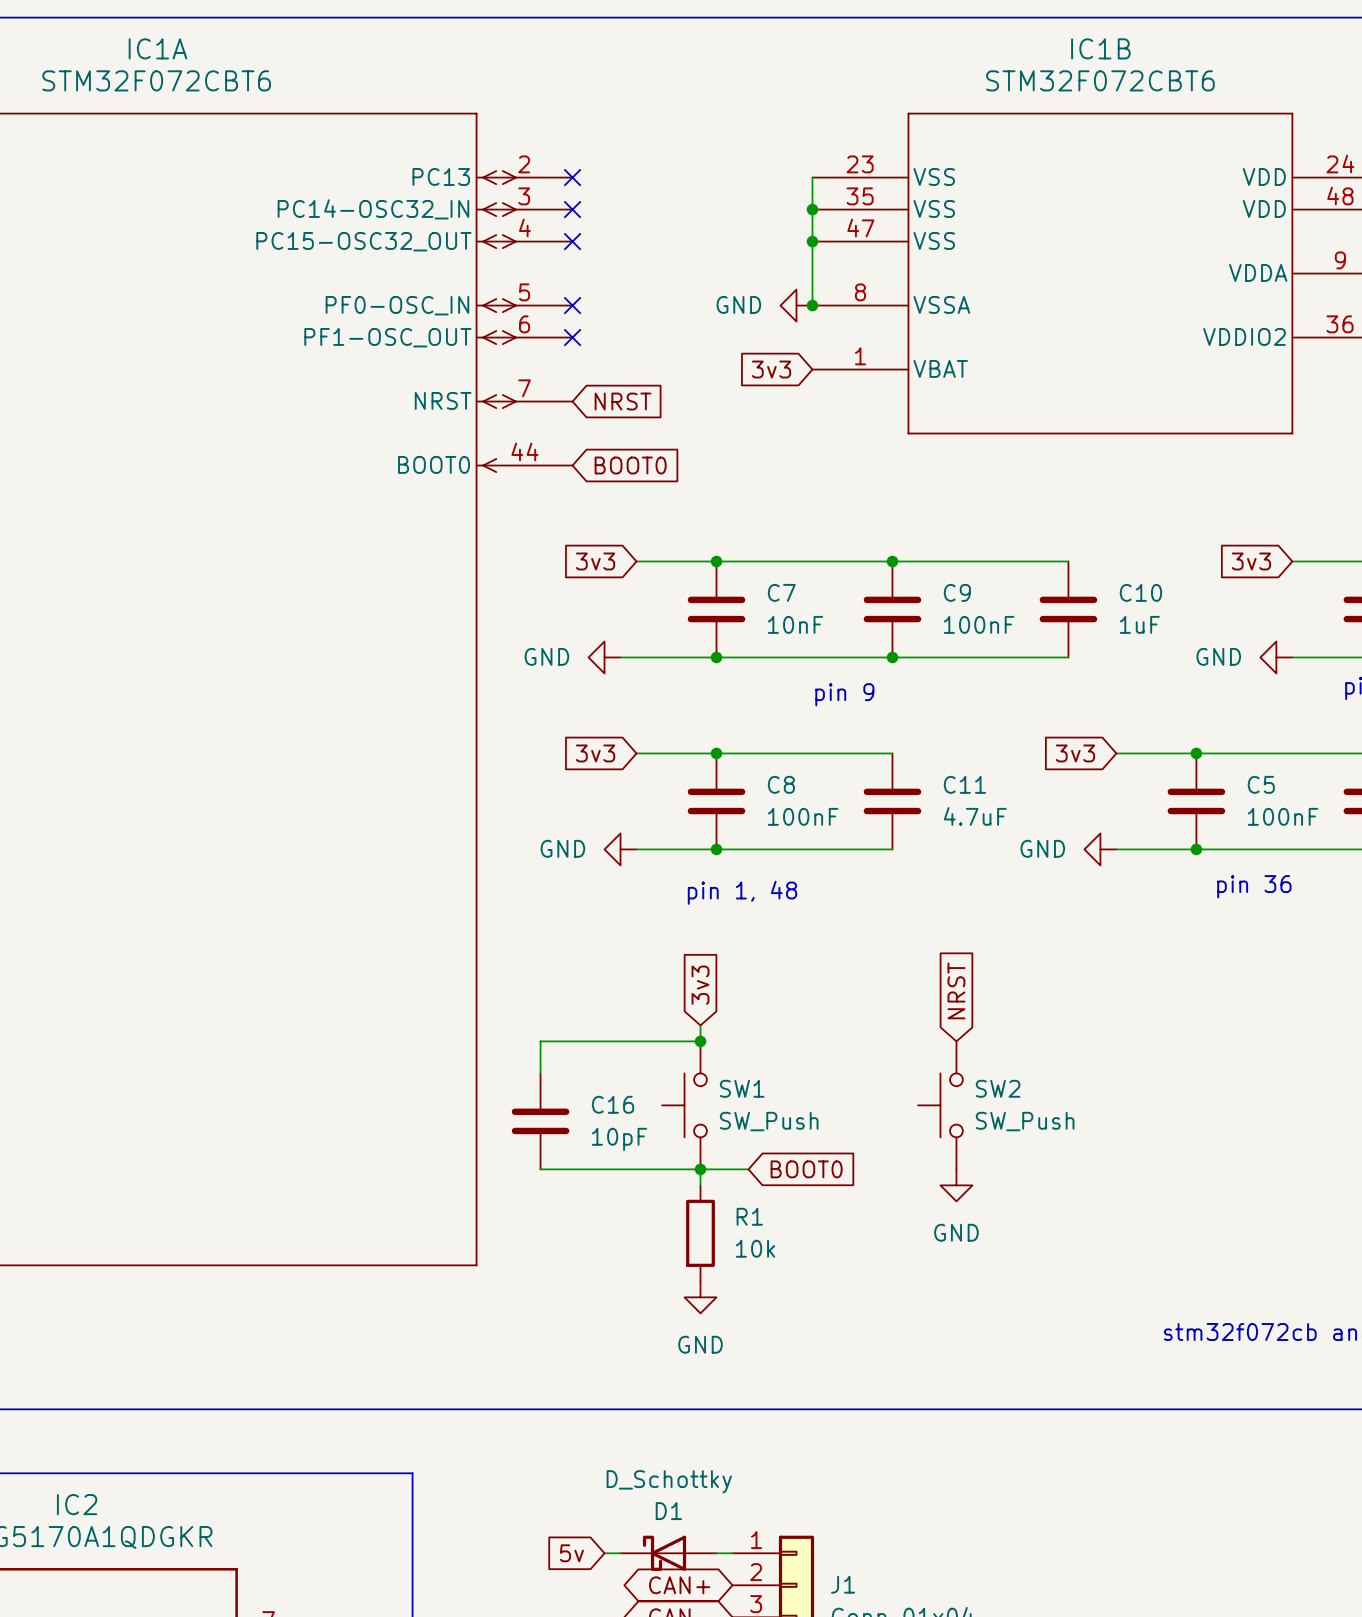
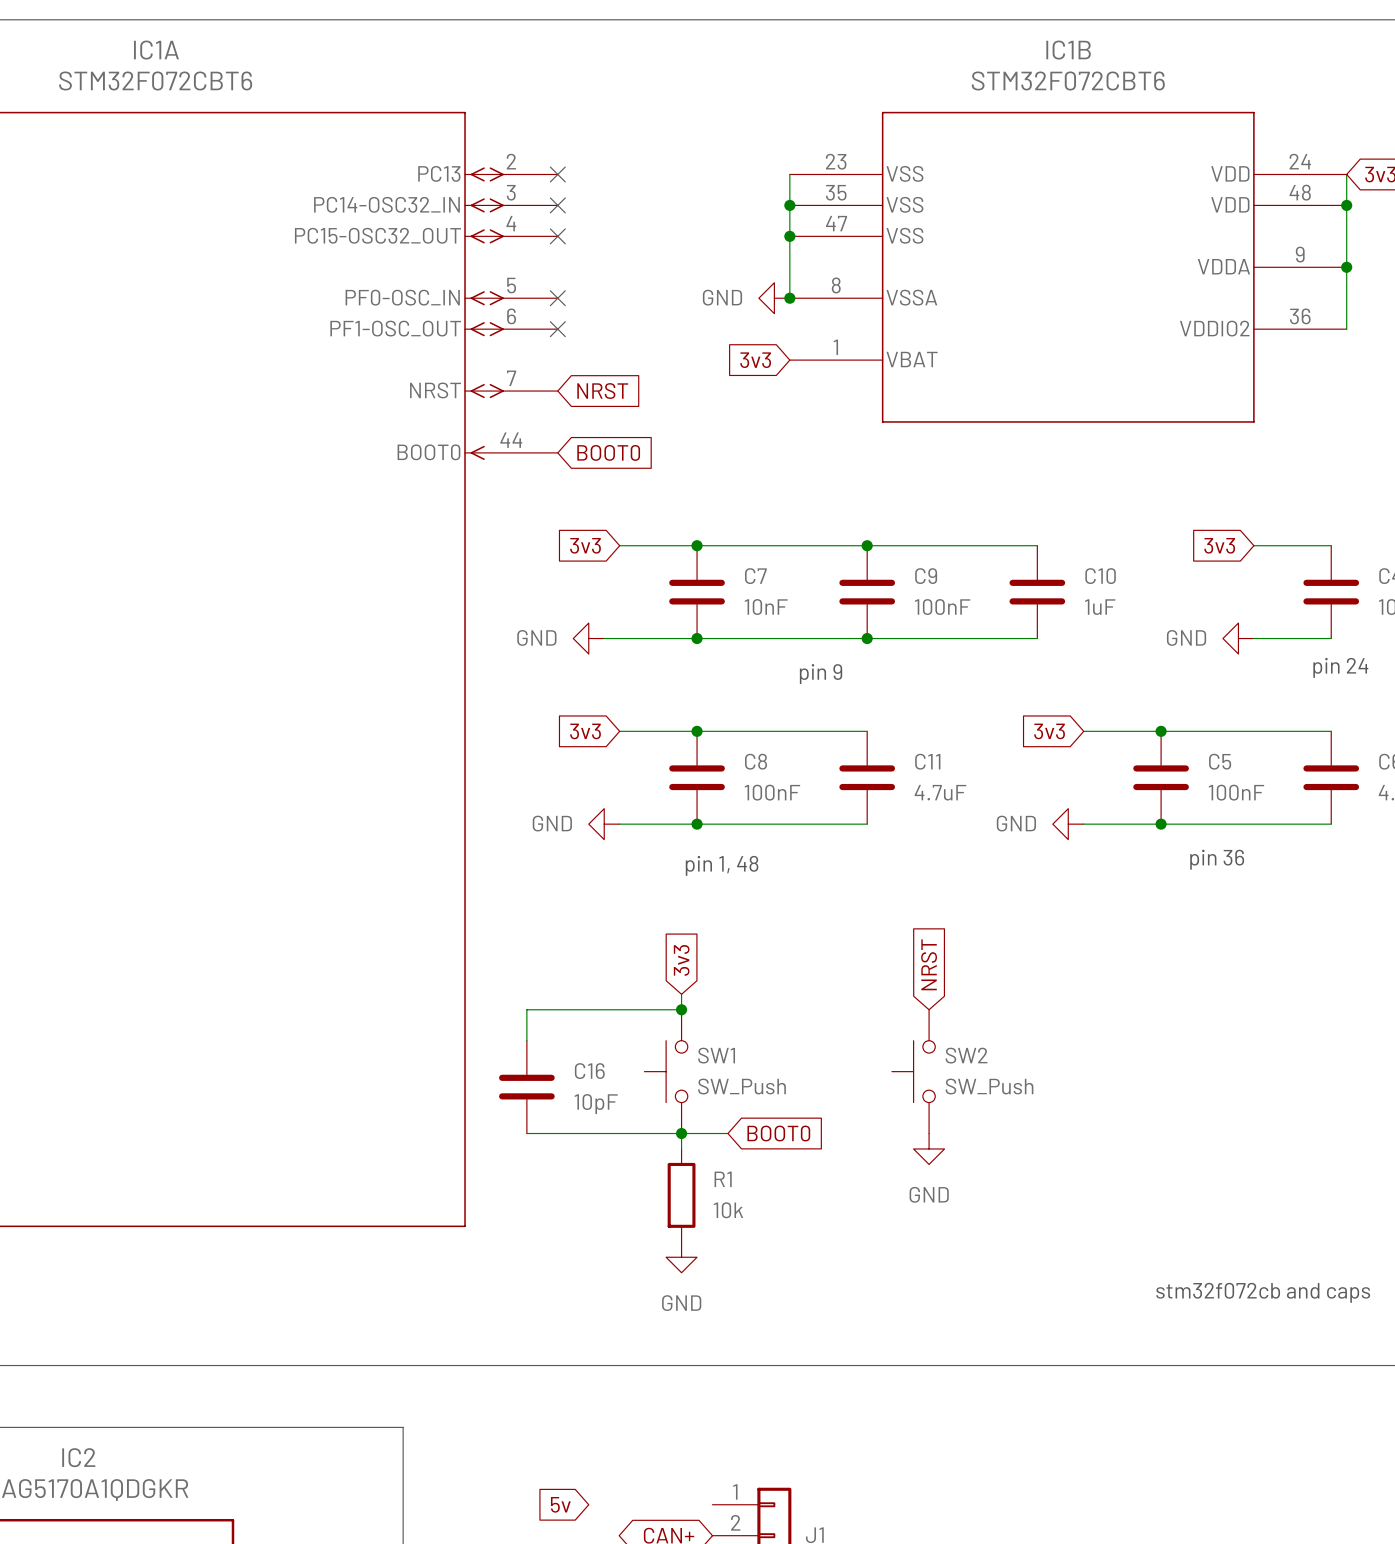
wire: (604, 1553) (620, 1553) -> none
D1: D_Schottky (668, 1553) -> none
wire: (716, 1553) (732, 1553) -> none

